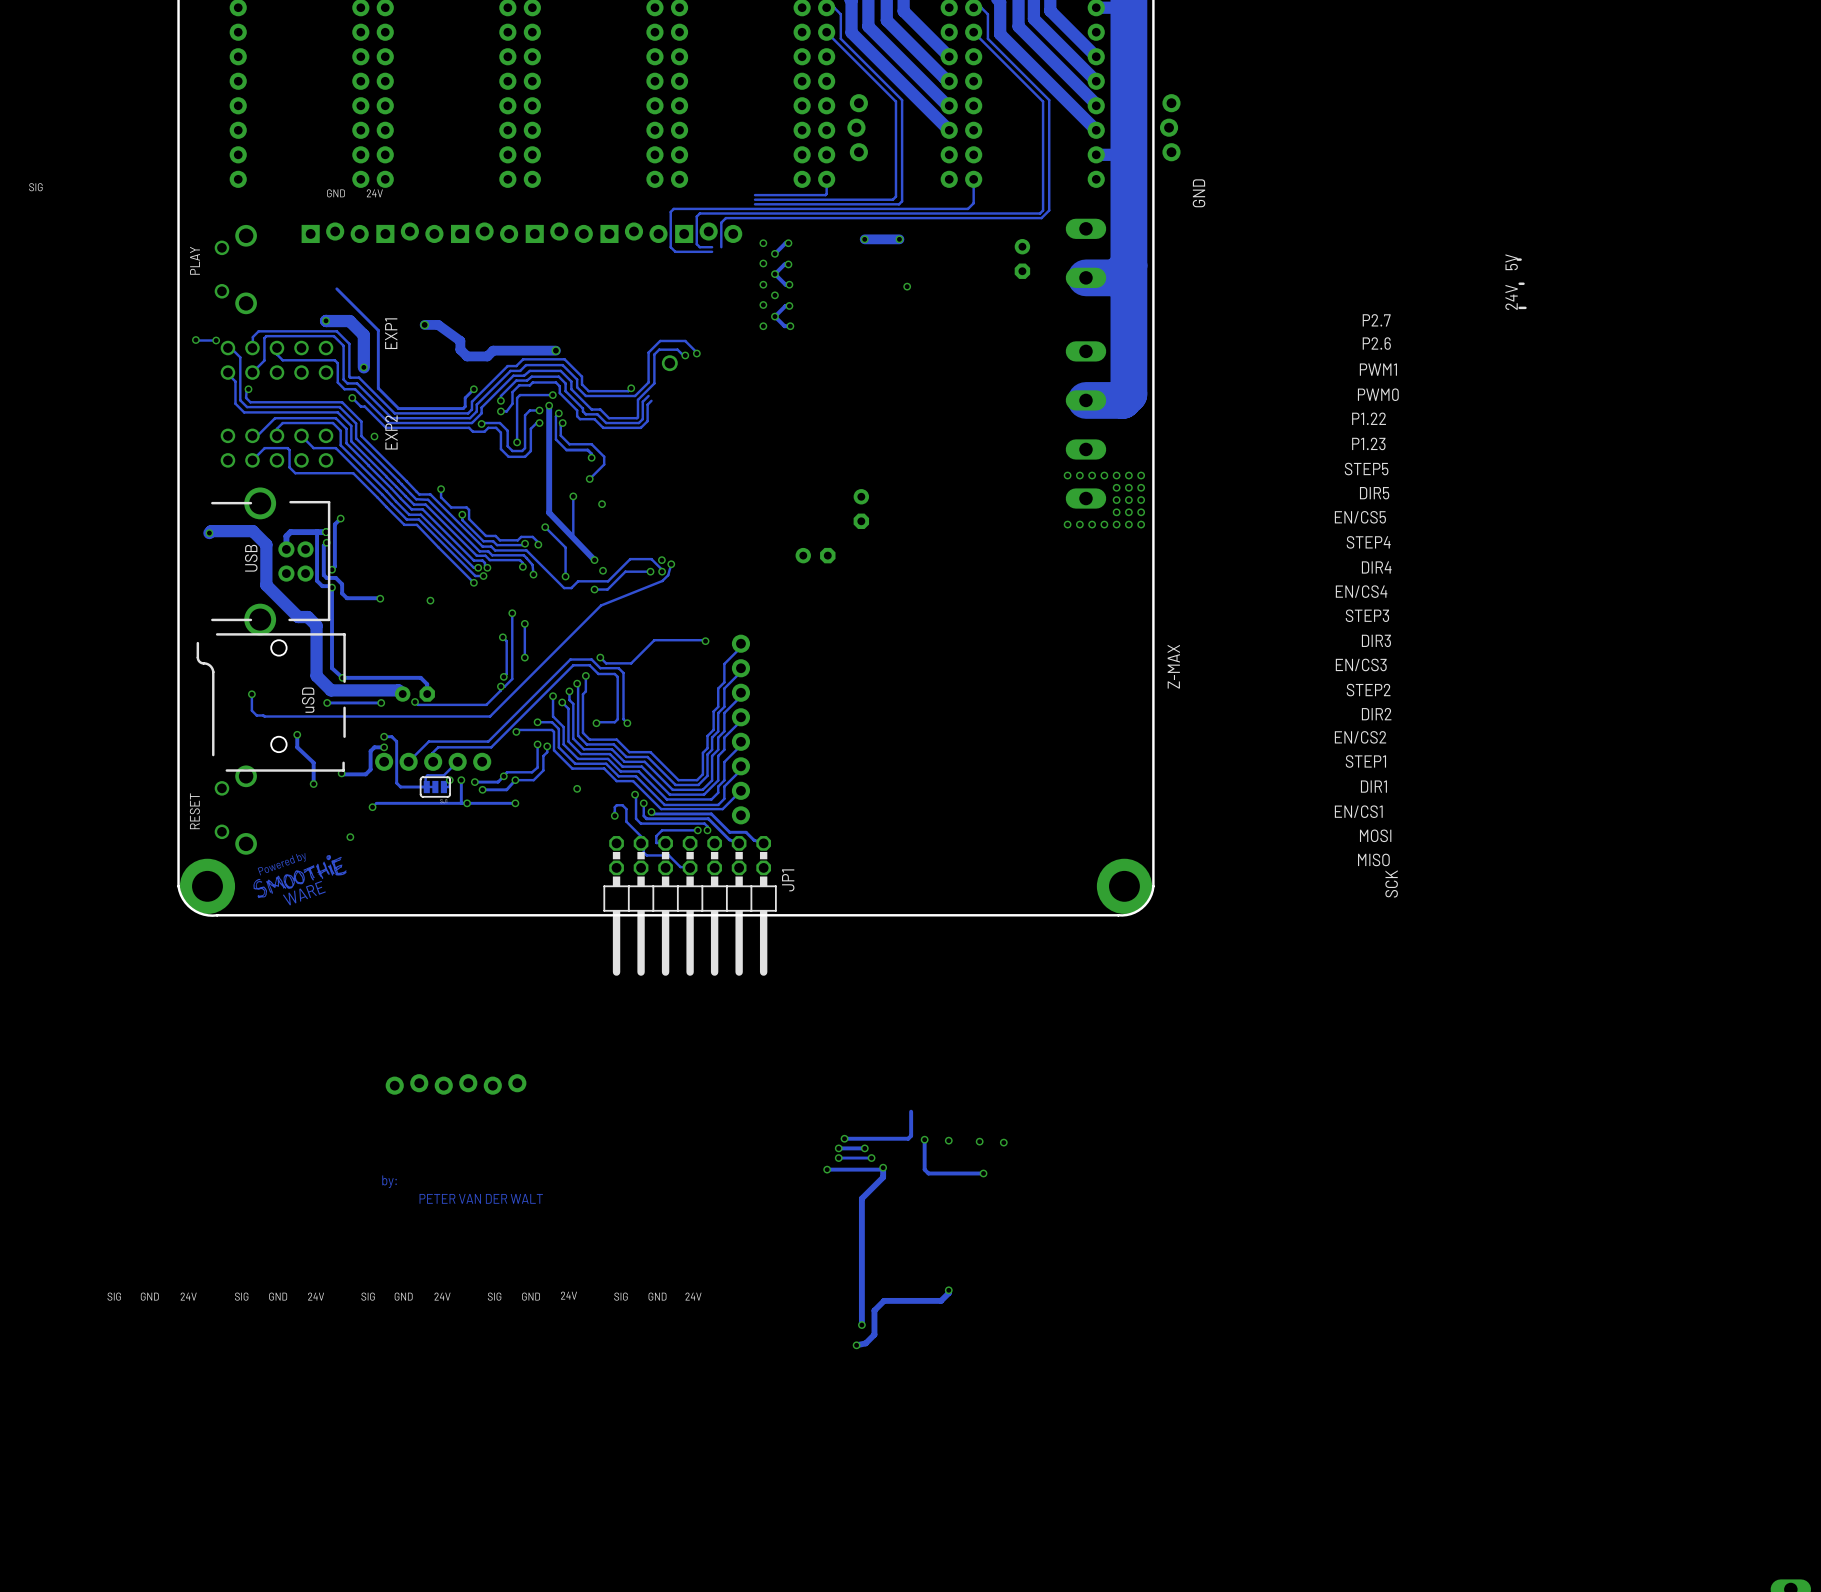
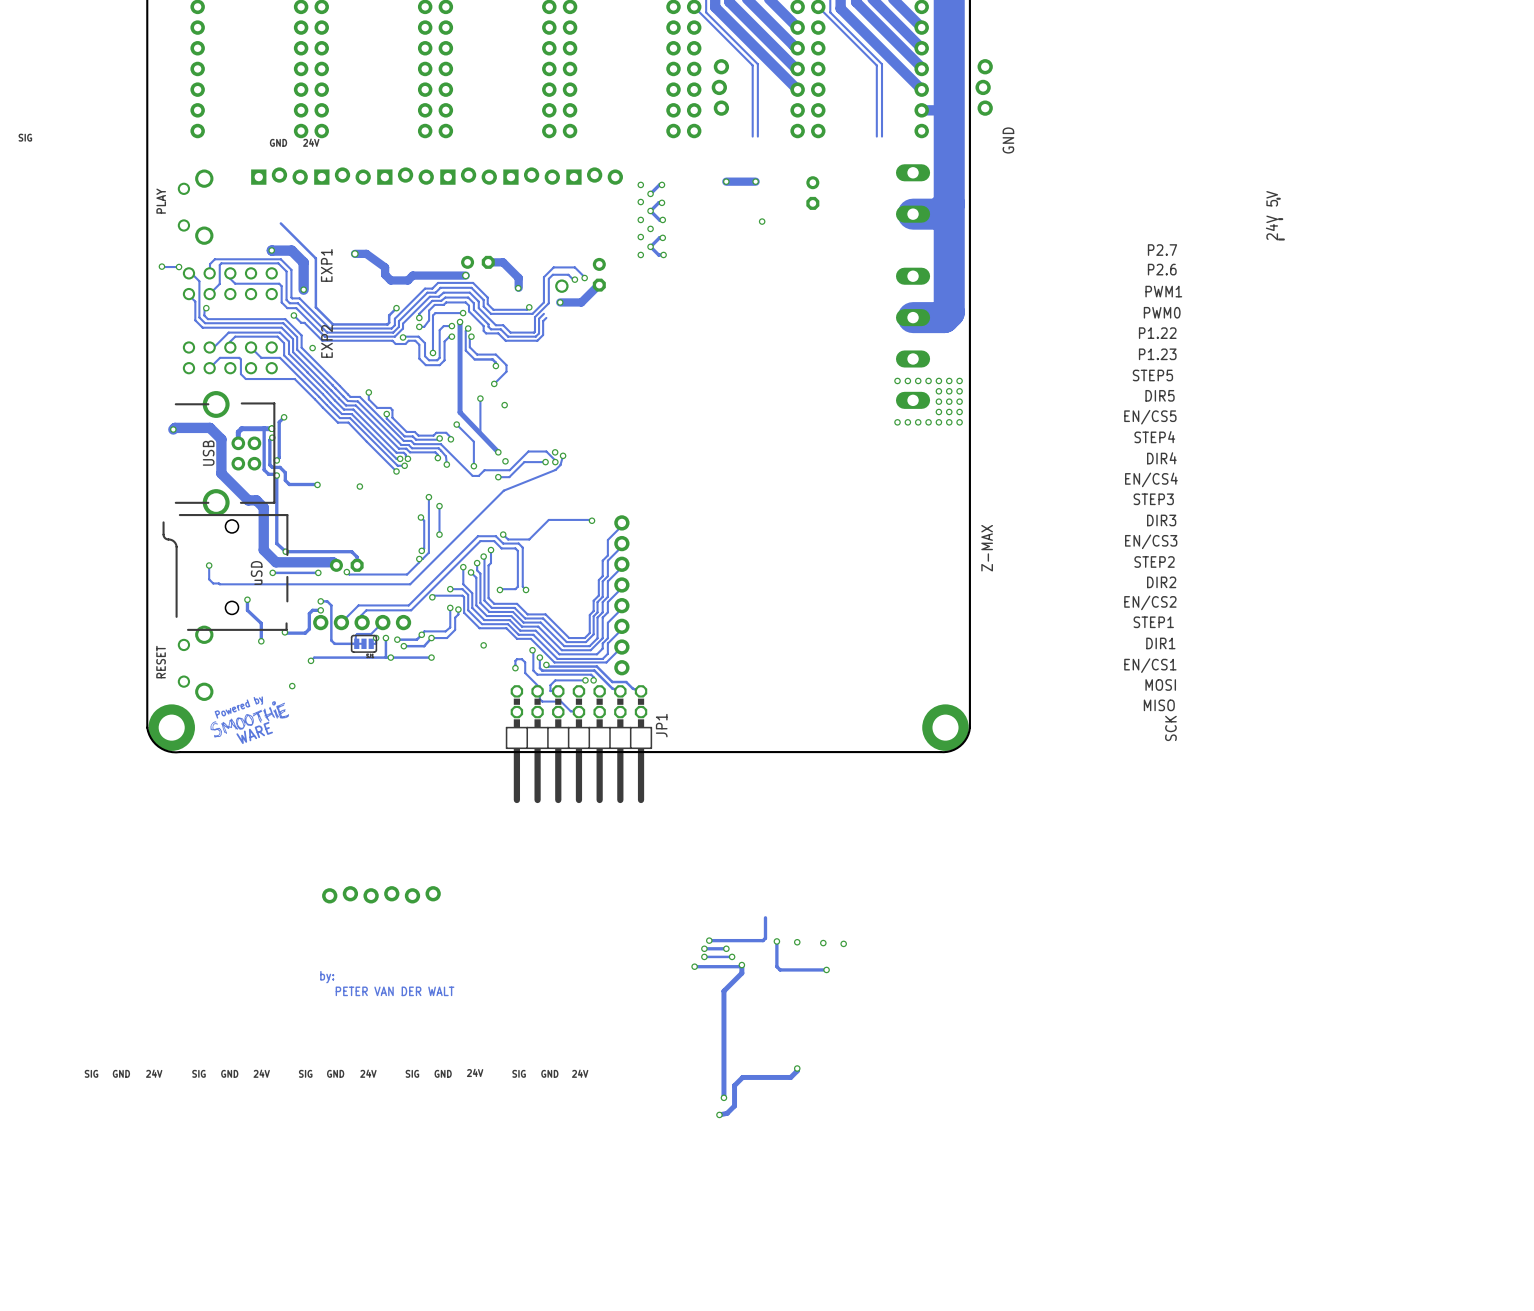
track: (826, 179) (825, 195) (755, 195) -> none
track: (973, 179) (973, 203) (968, 208) (673, 208) (670, 211) (670, 247) (675, 251) (712, 251) -> none
track: (895, 185) (895, 196) (892, 199) (755, 199) -> none
track: (902, 185) (902, 201) (899, 204) (755, 204) -> none
track: (1043, 185) (1043, 210) (1040, 213) (699, 213) (696, 216) (696, 244) (699, 247) (712, 247) -> none
track: (1049, 185) (1049, 210) (1041, 218) (725, 218) (721, 222) (721, 247) -> none
part position: (1022, 258) -> (812, 193)
part: none -> (477, 262)
track: none -> (488, 262) (503, 262) (518, 278) (518, 288)
part: none -> (599, 274)
track: none -> (599, 285) (581, 302) (560, 302)
via: none -> (518, 288)
via: none -> (560, 302)
part: (861, 509) -> none
part: (815, 555) -> none

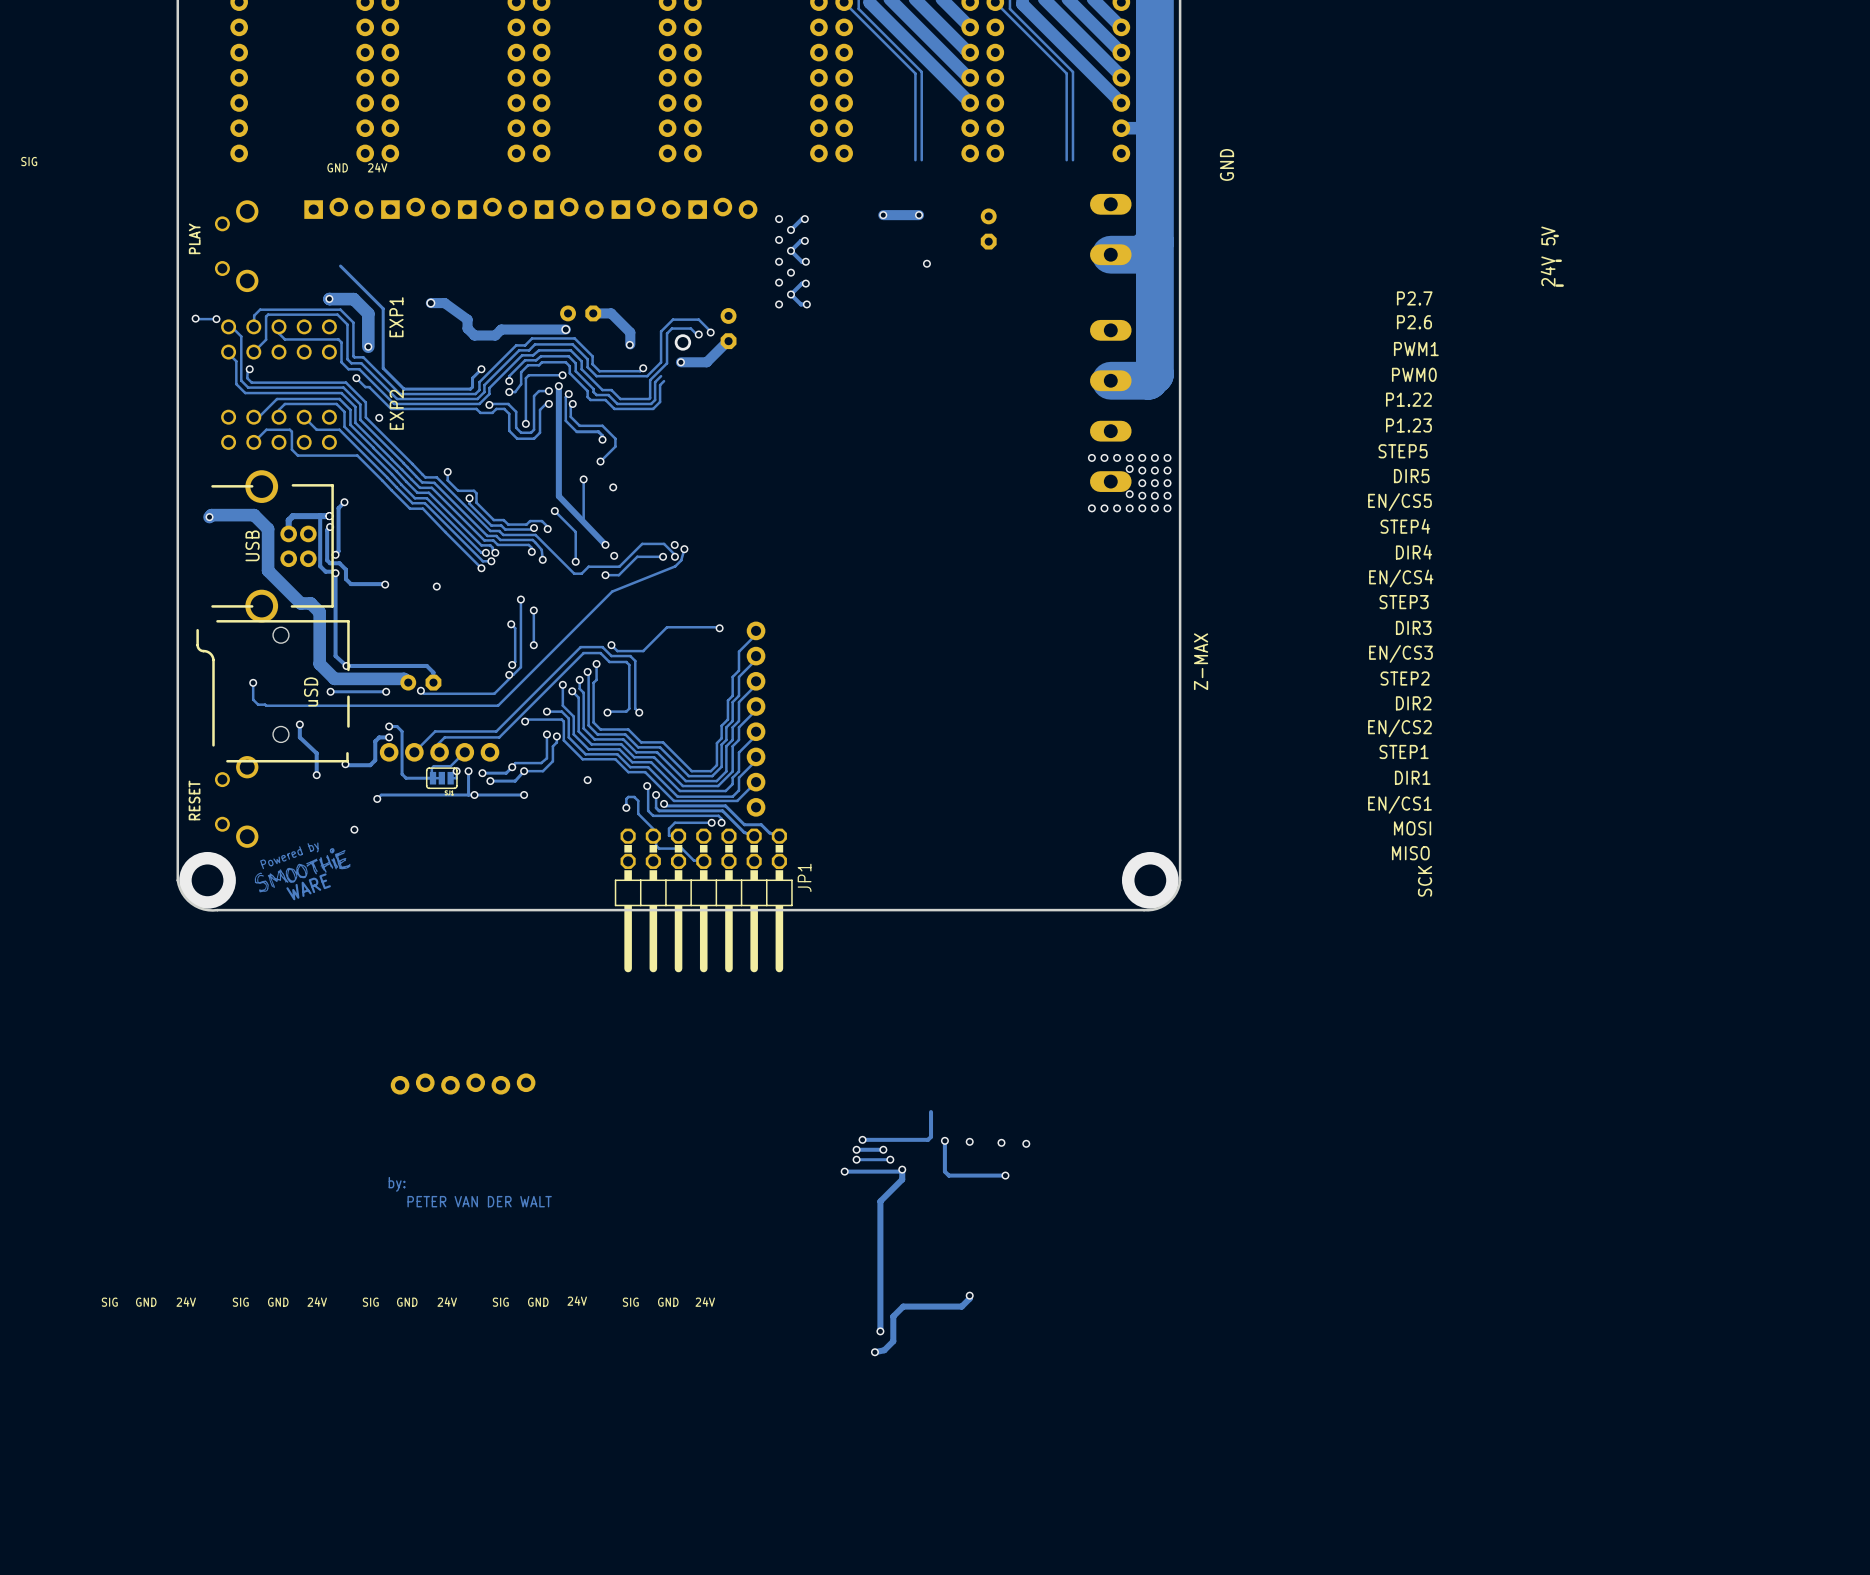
part: (720, 87) -> none
part: (984, 87) -> none
via: none -> (1129, 468)
via: none -> (1129, 494)

